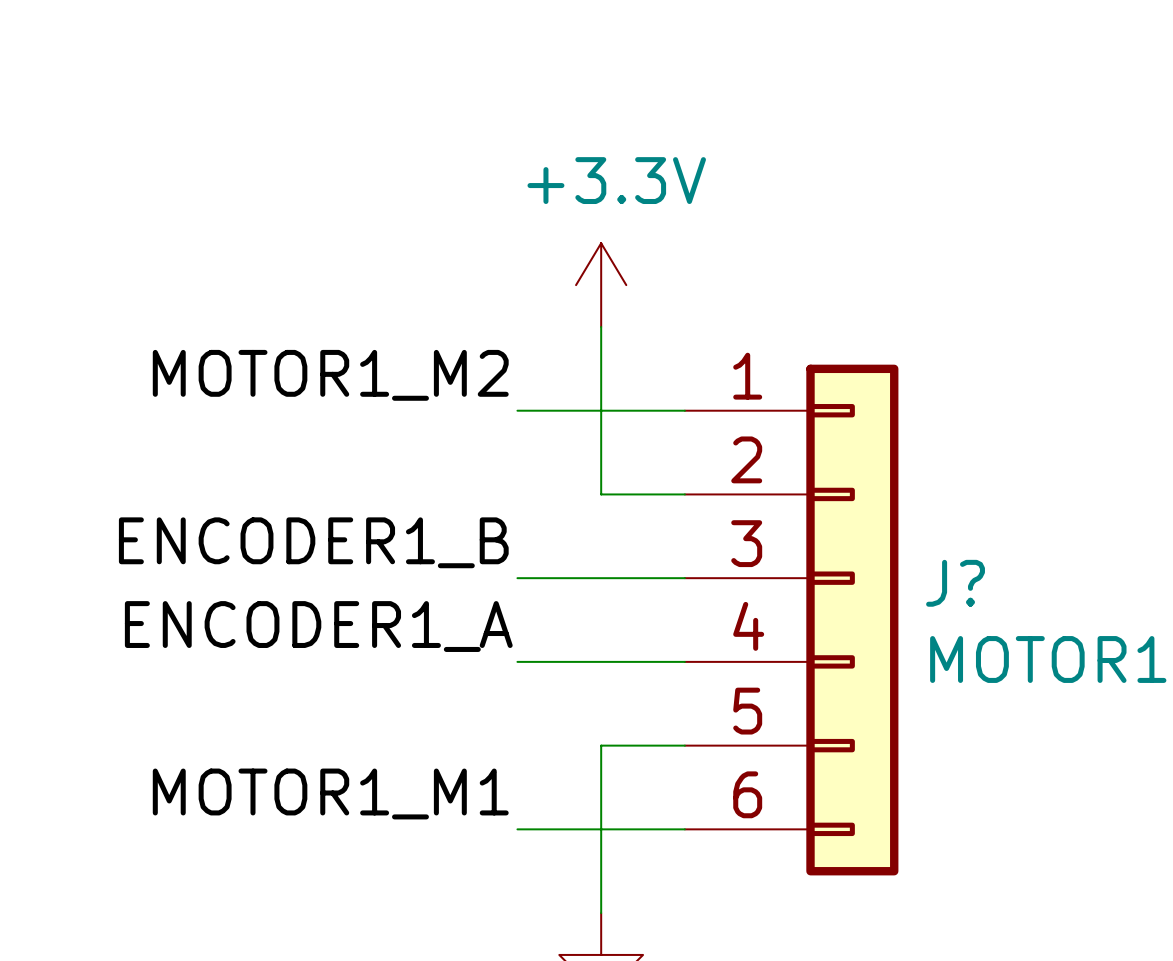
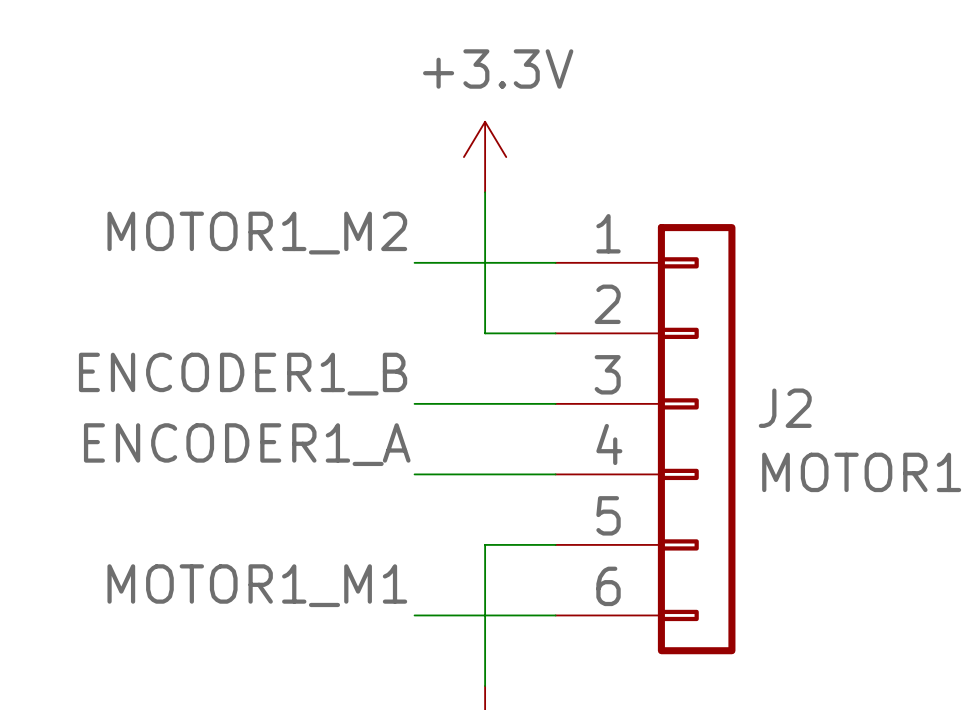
J? name: J? (955, 583) -> J2 (785, 408)

